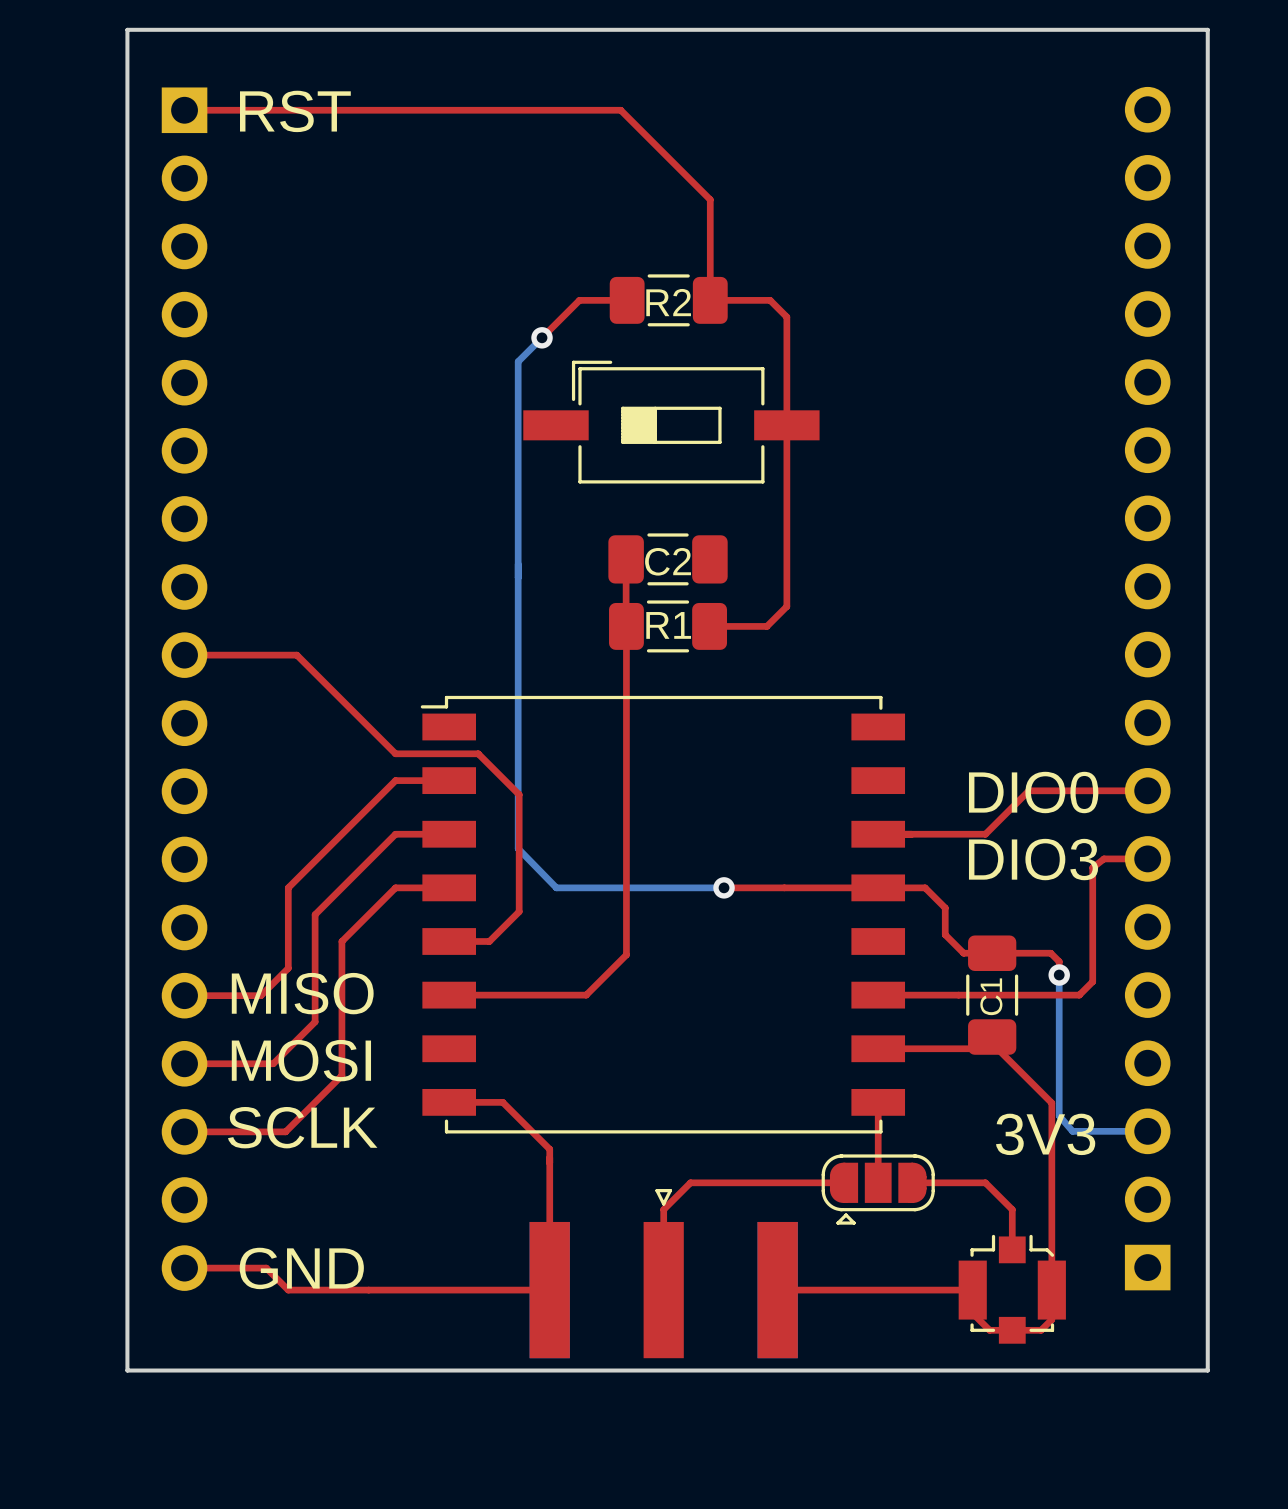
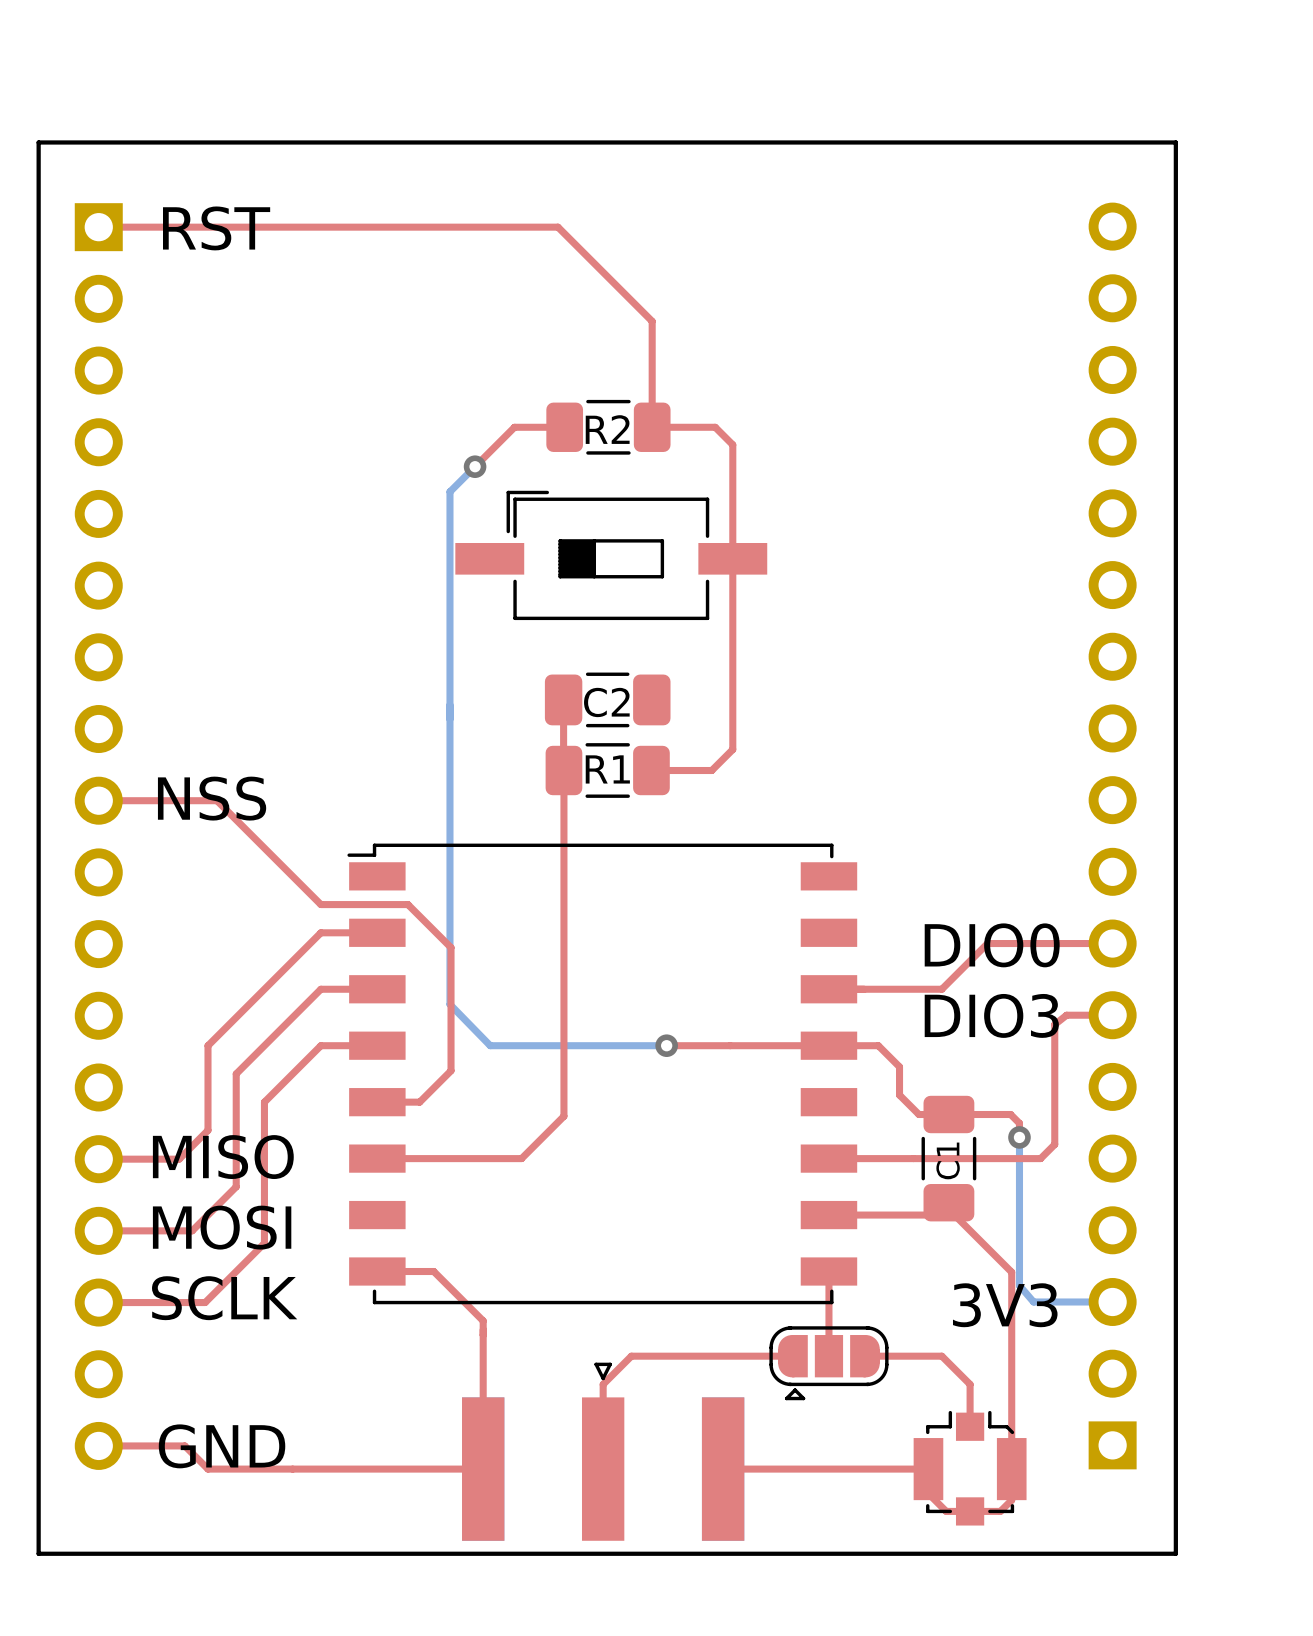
text: none -> NSS (212, 798)

